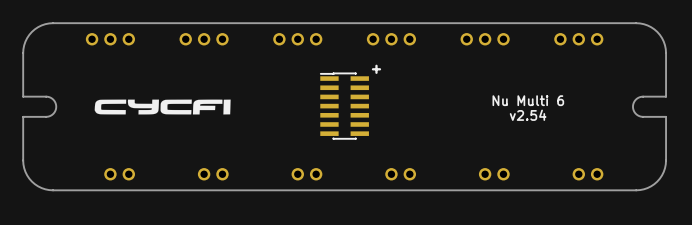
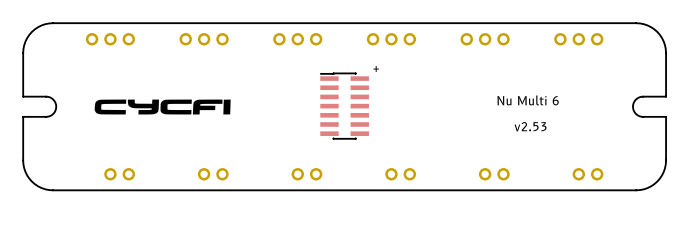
text: v2.54 (528, 115) -> v2.53 (530, 126)

